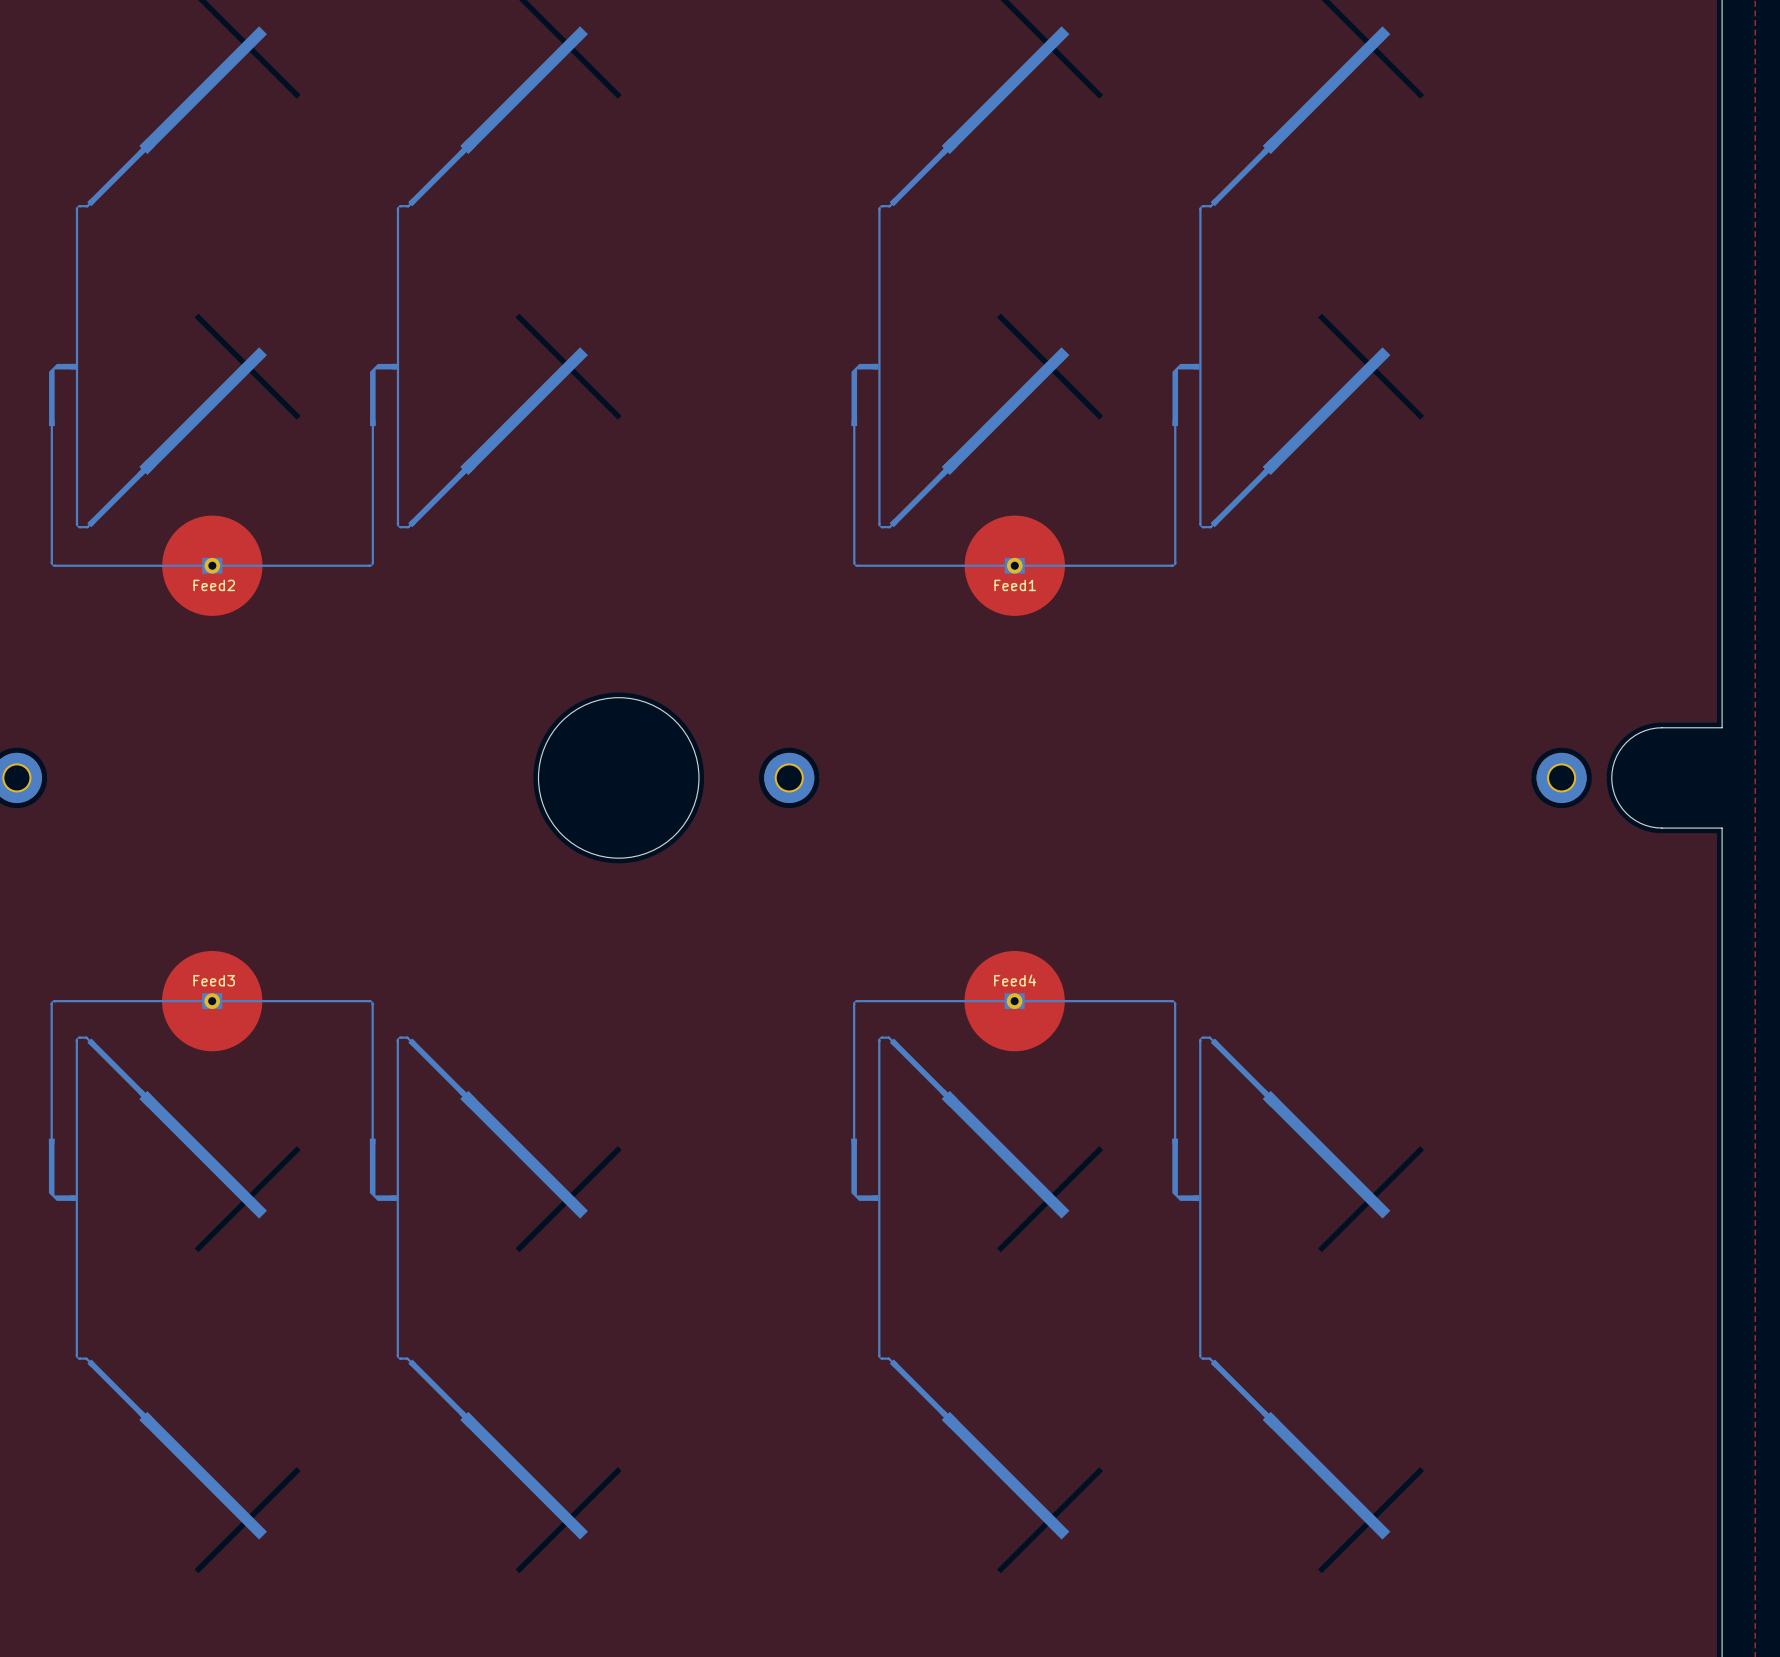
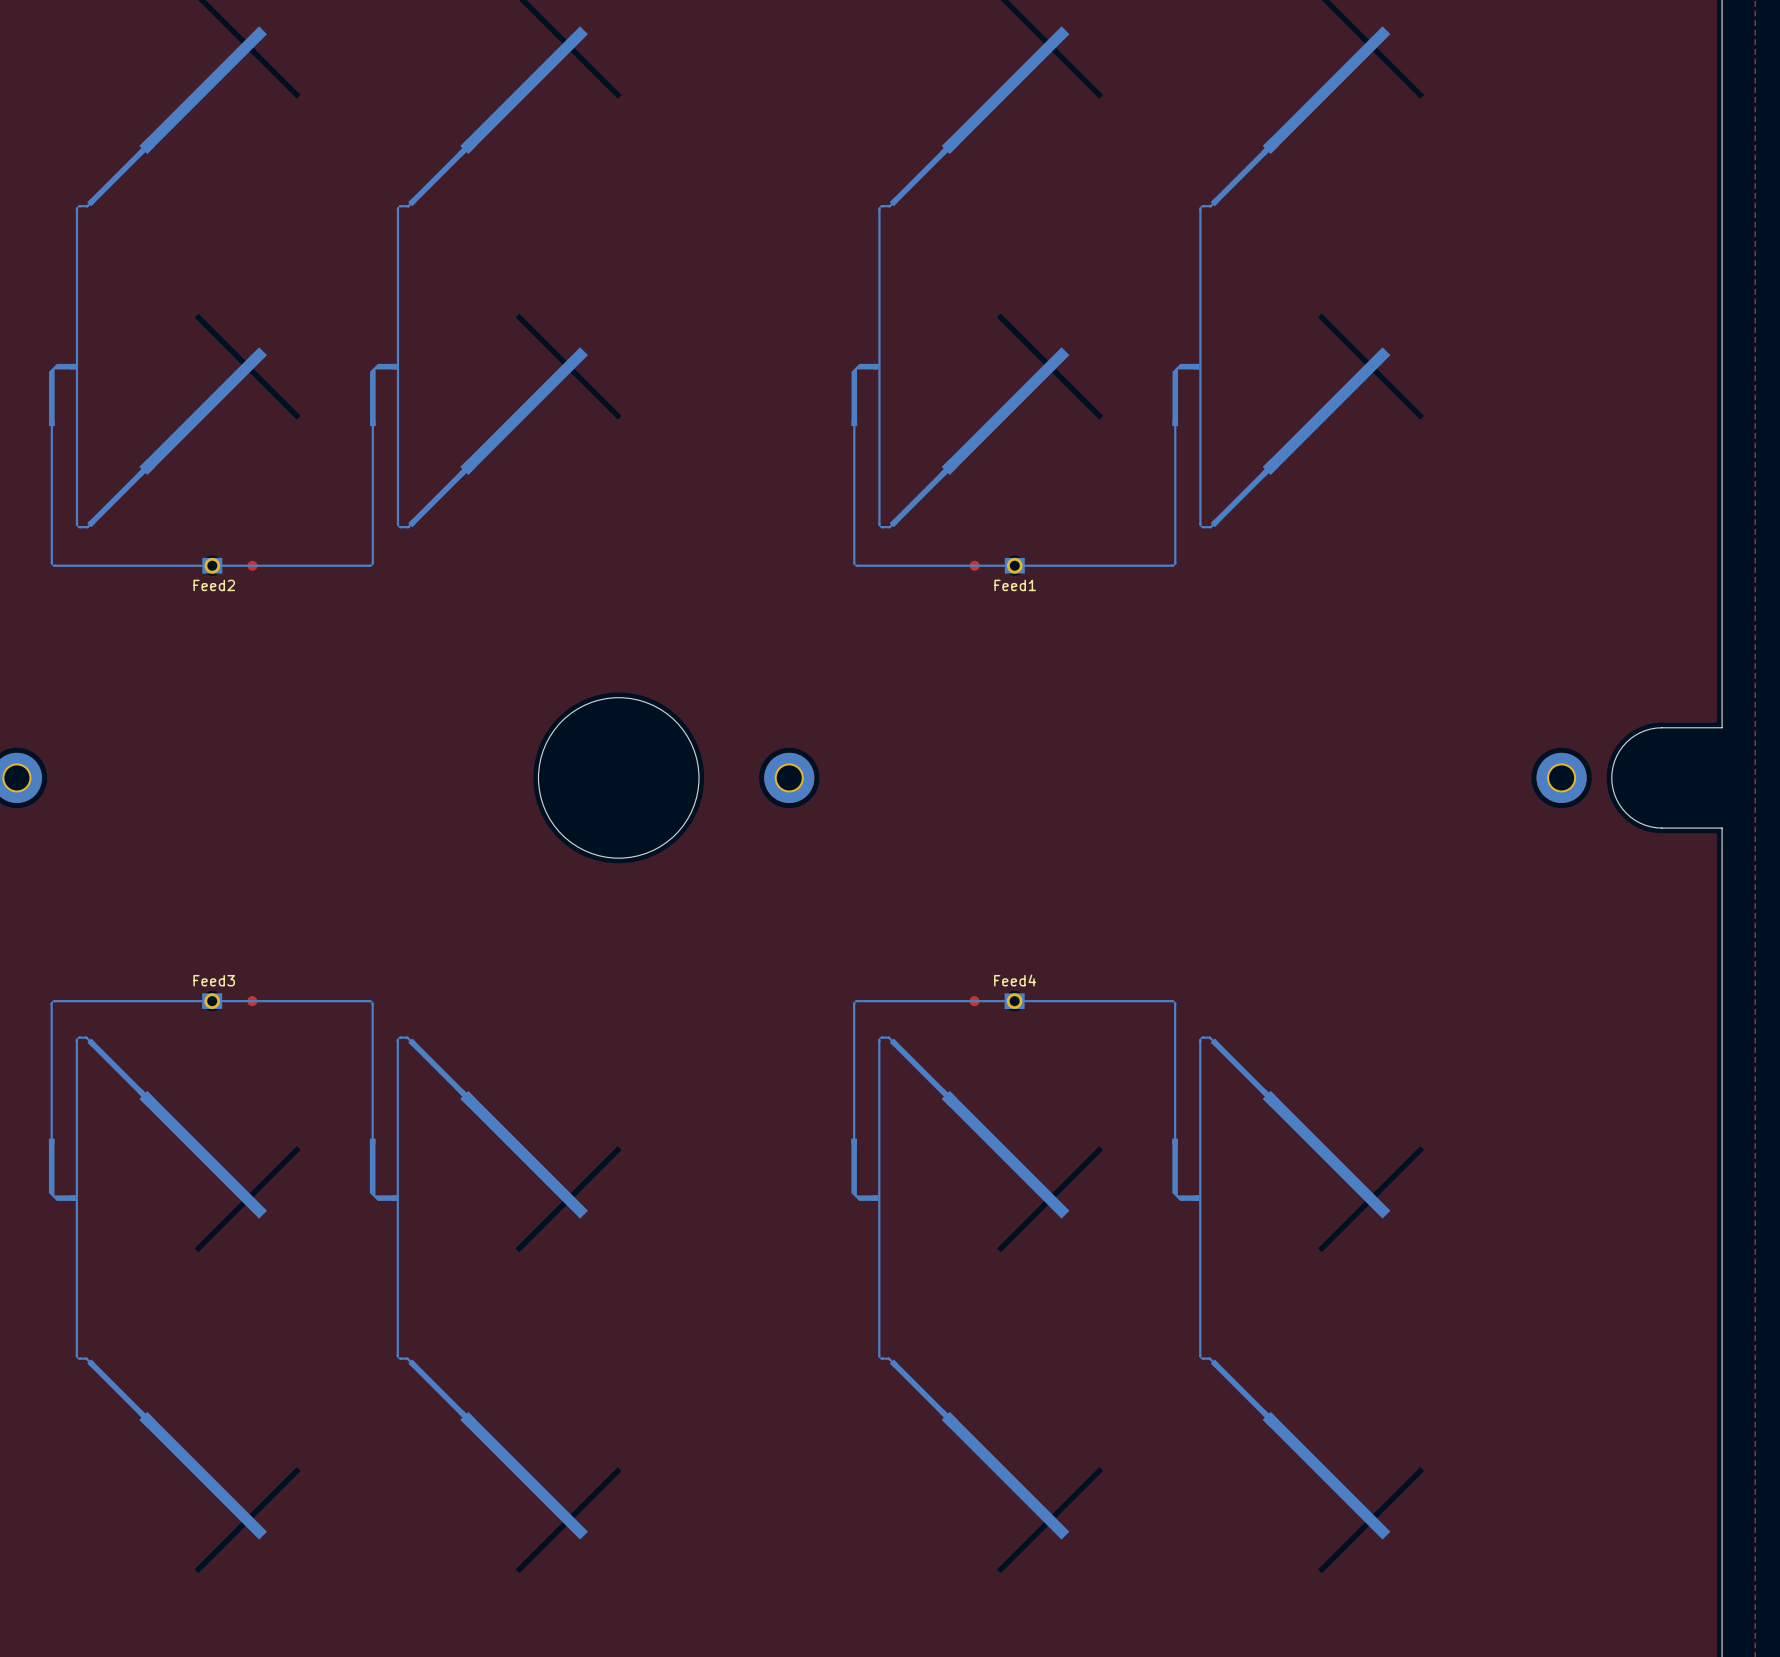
Feed2 footprint: [162, 515, 263, 616] -> [202, 557, 258, 574]
Feed1 footprint: [964, 515, 1065, 616] -> [969, 557, 1025, 574]
Feed3 footprint: [162, 950, 263, 1052] -> [202, 993, 258, 1009]
Feed4 footprint: [964, 950, 1065, 1052] -> [969, 993, 1025, 1009]

